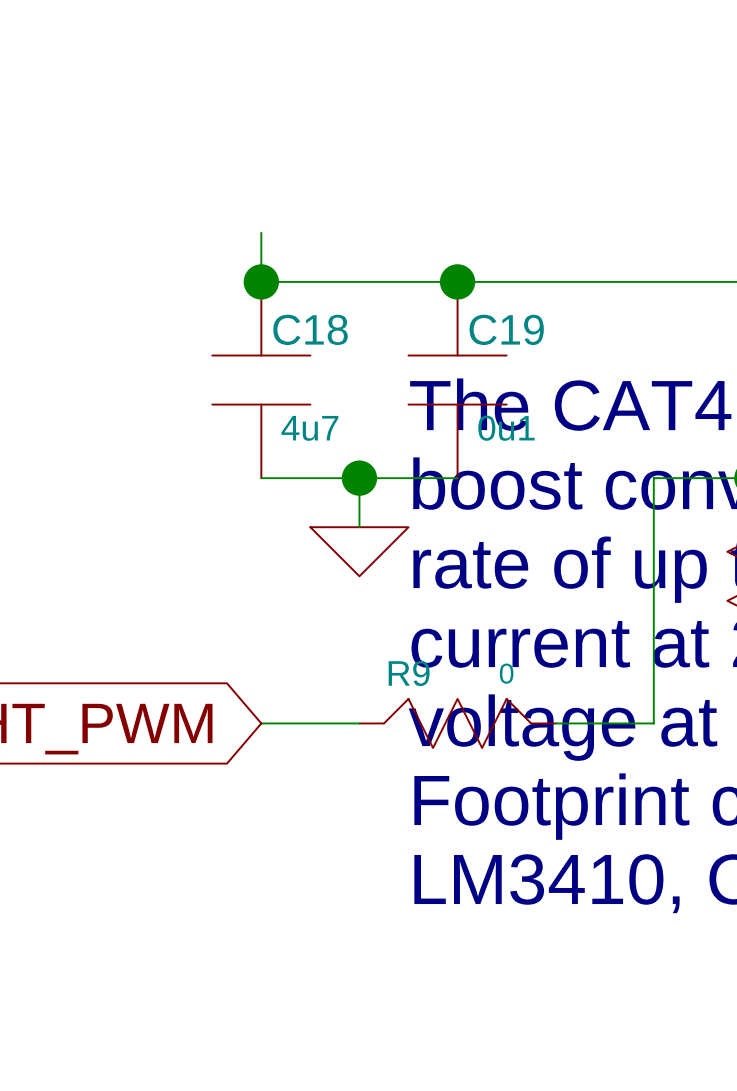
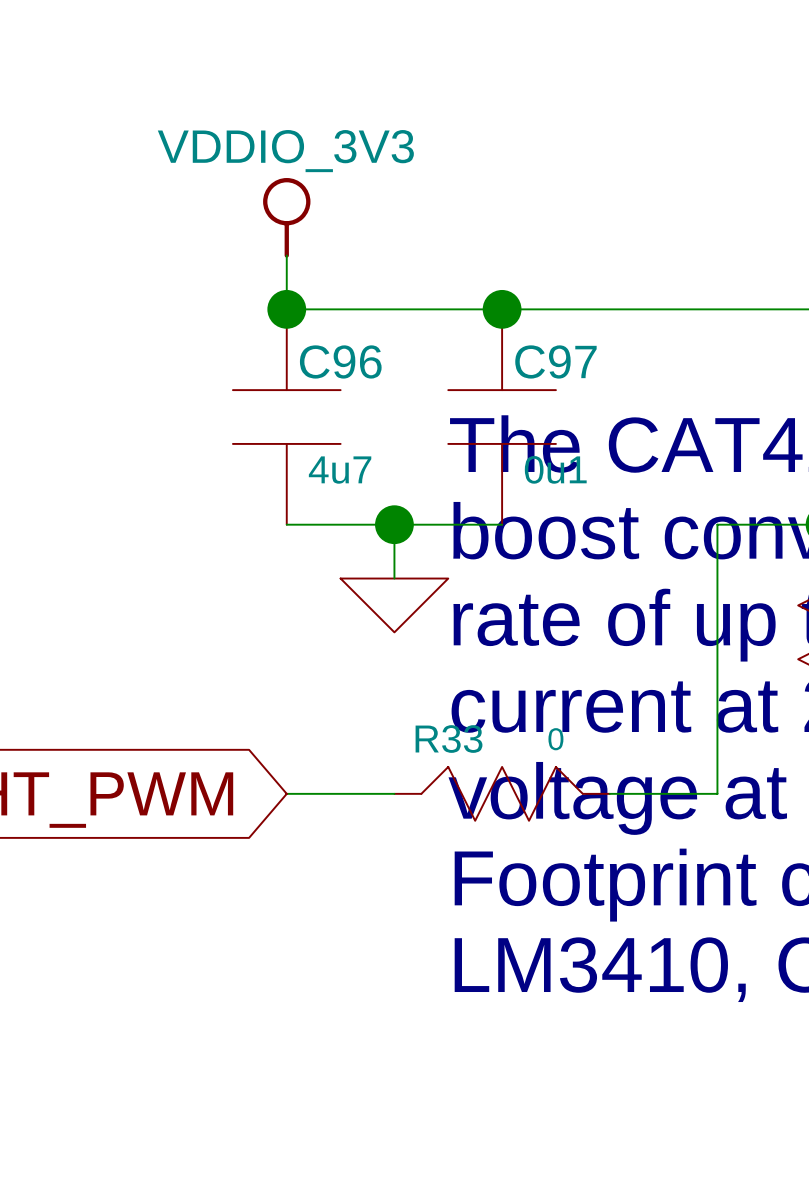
power symbol: none -> VDDIO_3V3 (286, 217)
C18 name: C18 (310, 329) -> C96 (340, 361)
C19 name: C19 (506, 329) -> C97 (555, 361)
R9 name: R9 (409, 673) -> R33 (449, 739)

